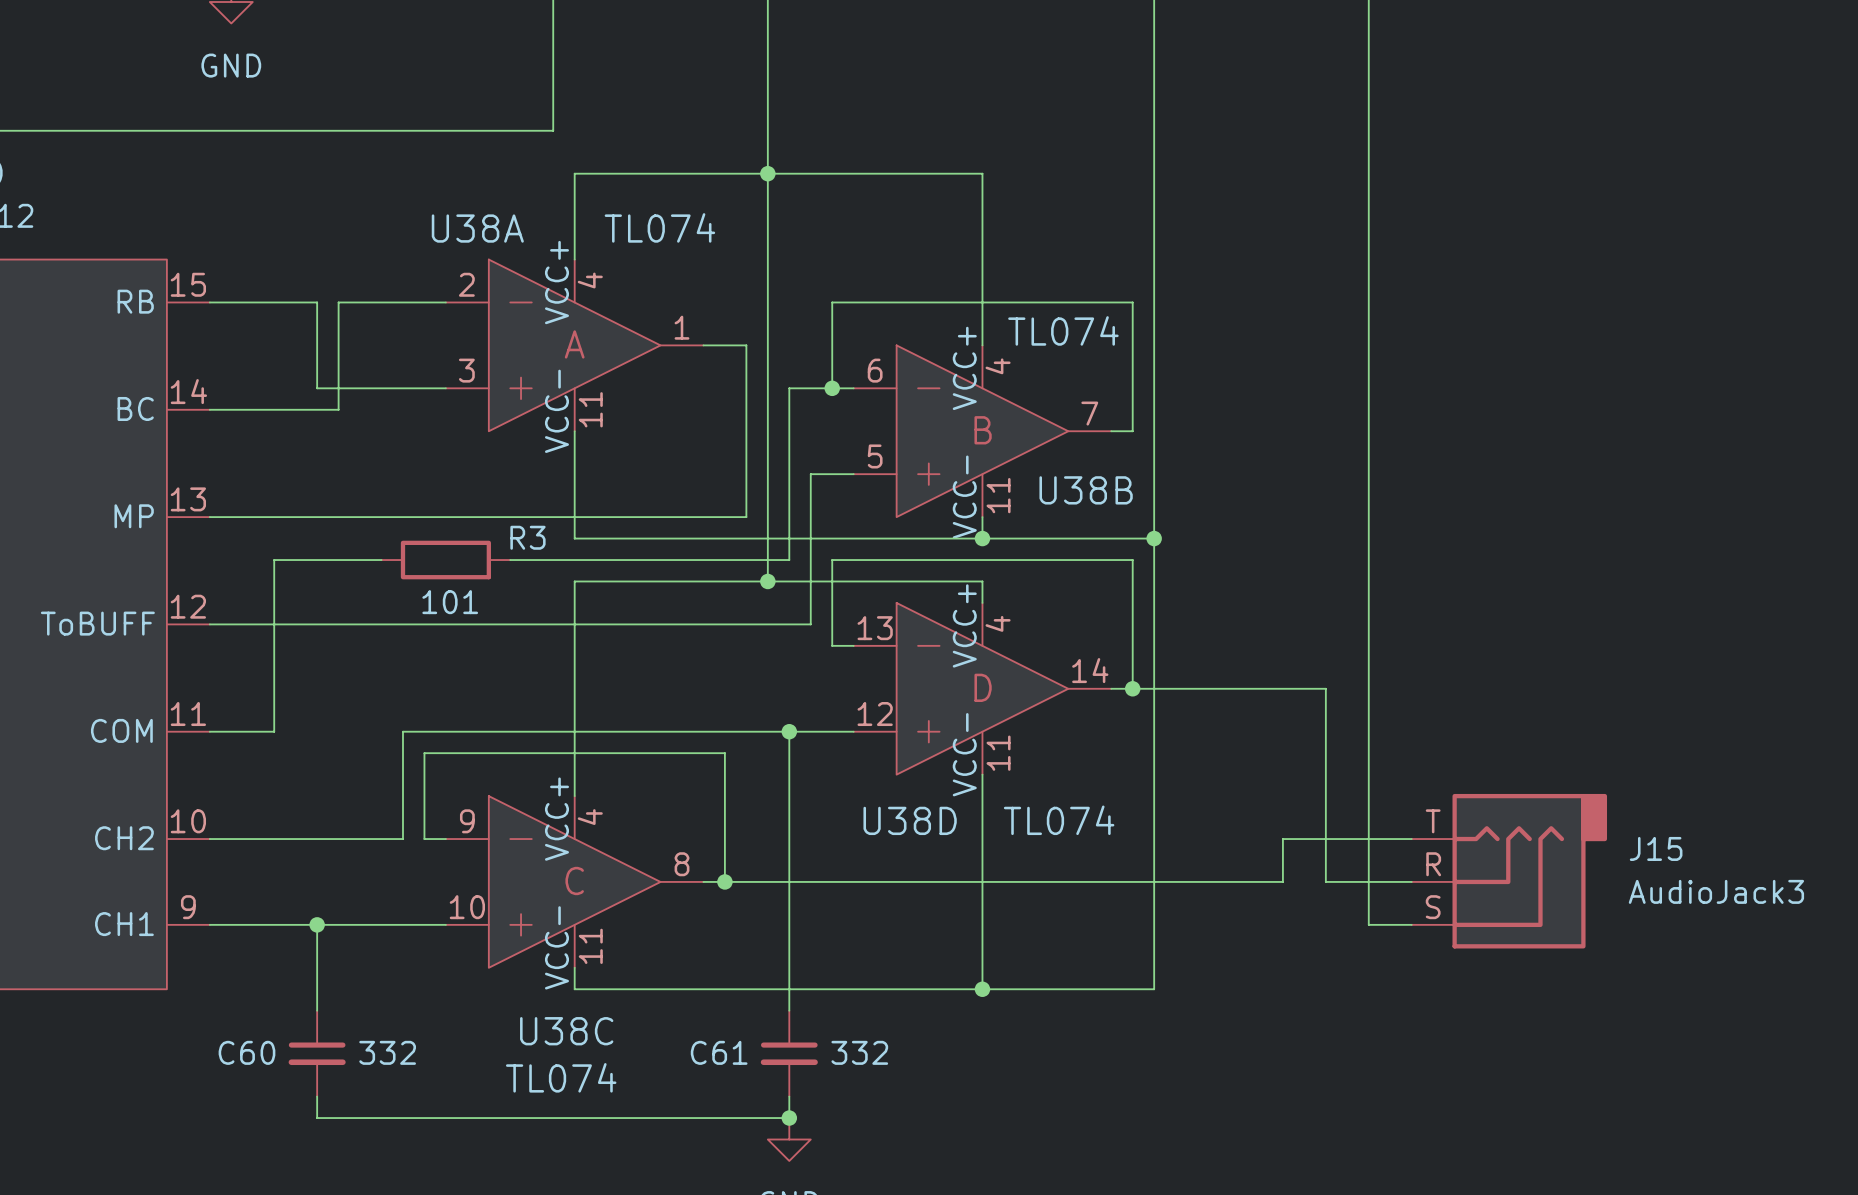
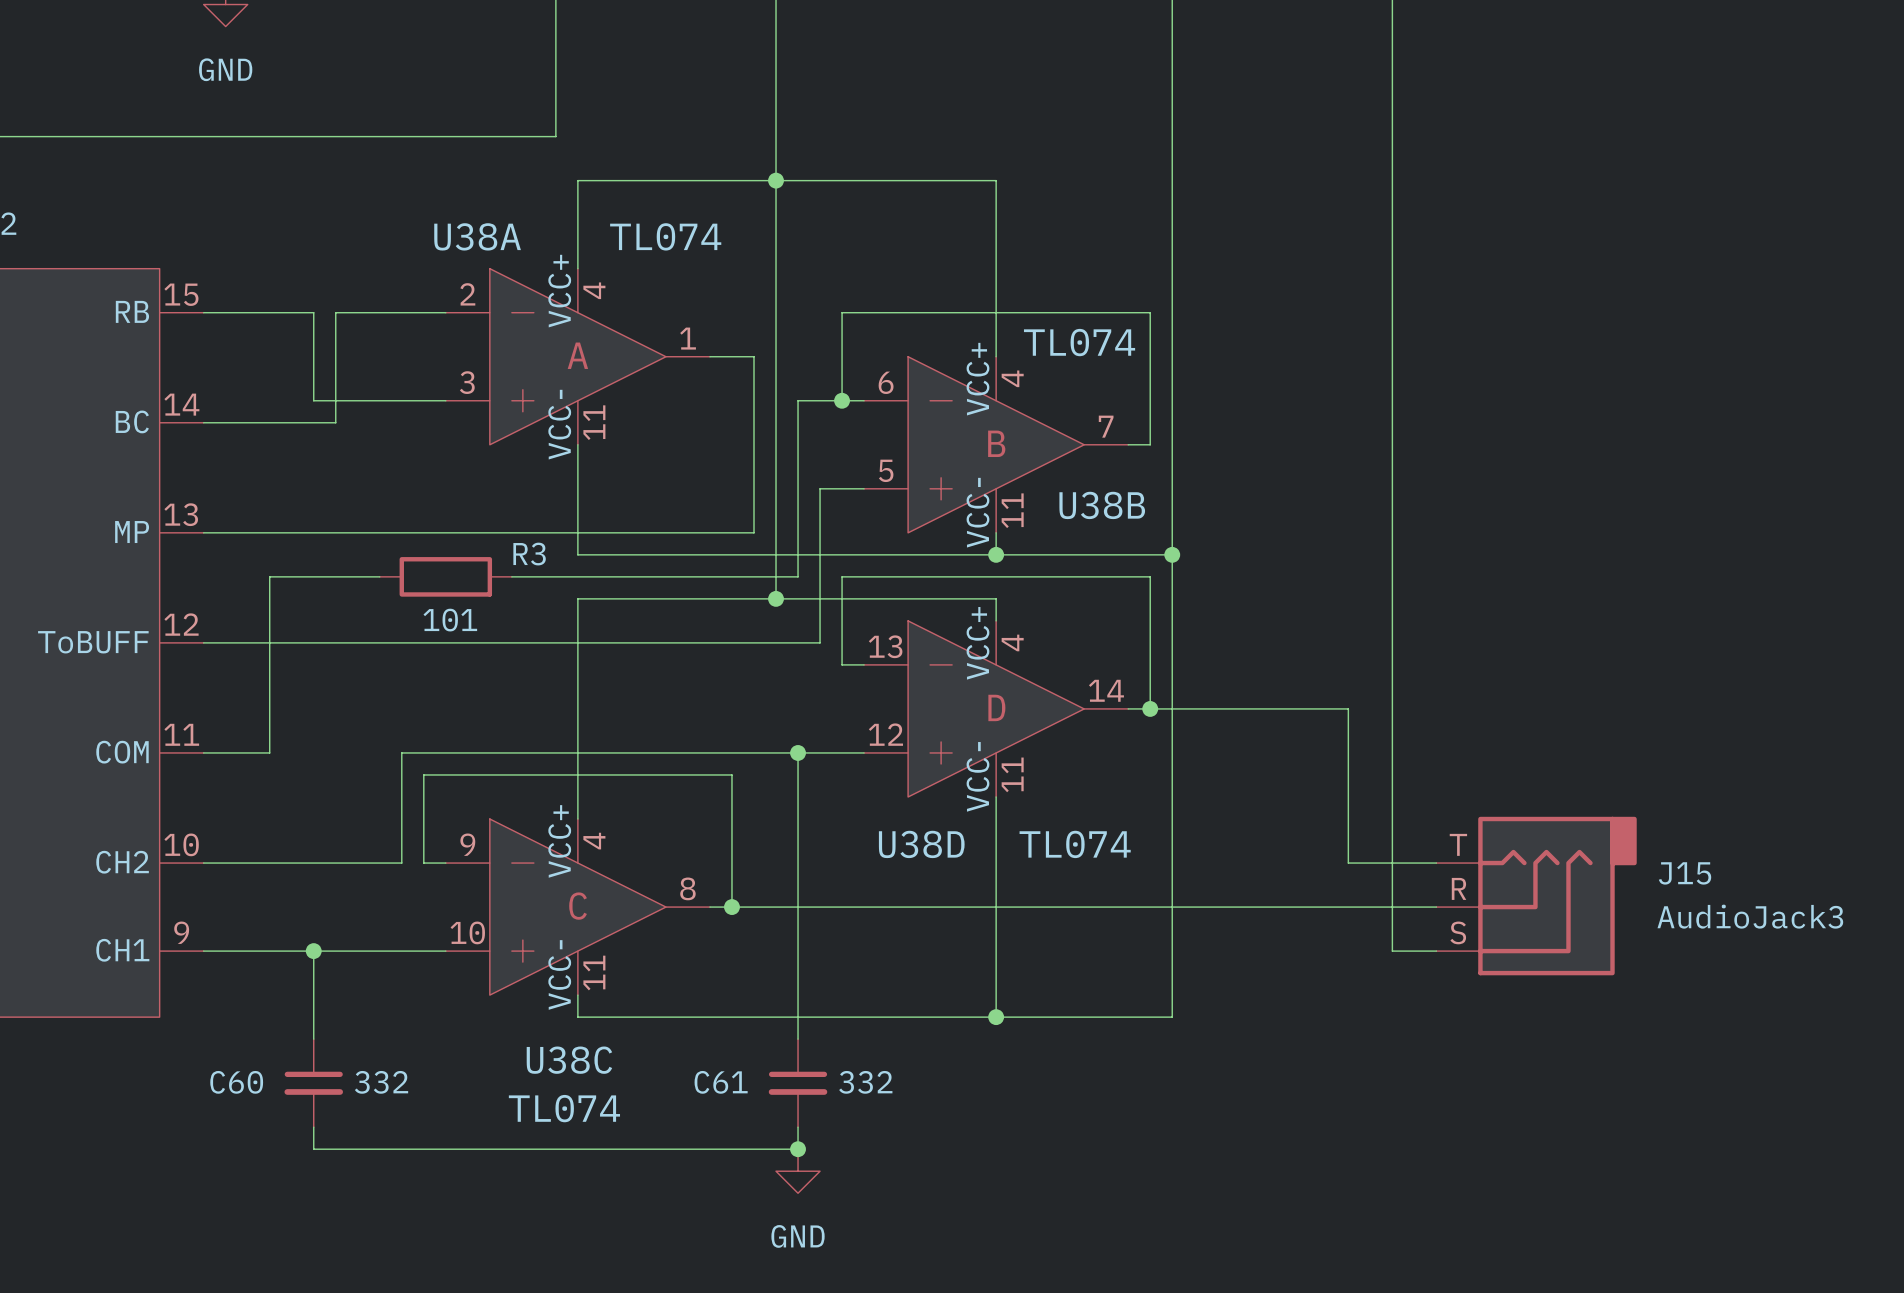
wire: (1282, 881) (1282, 839) (1325, 839) (1325, 881) -> (1304, 907) (1348, 907)

